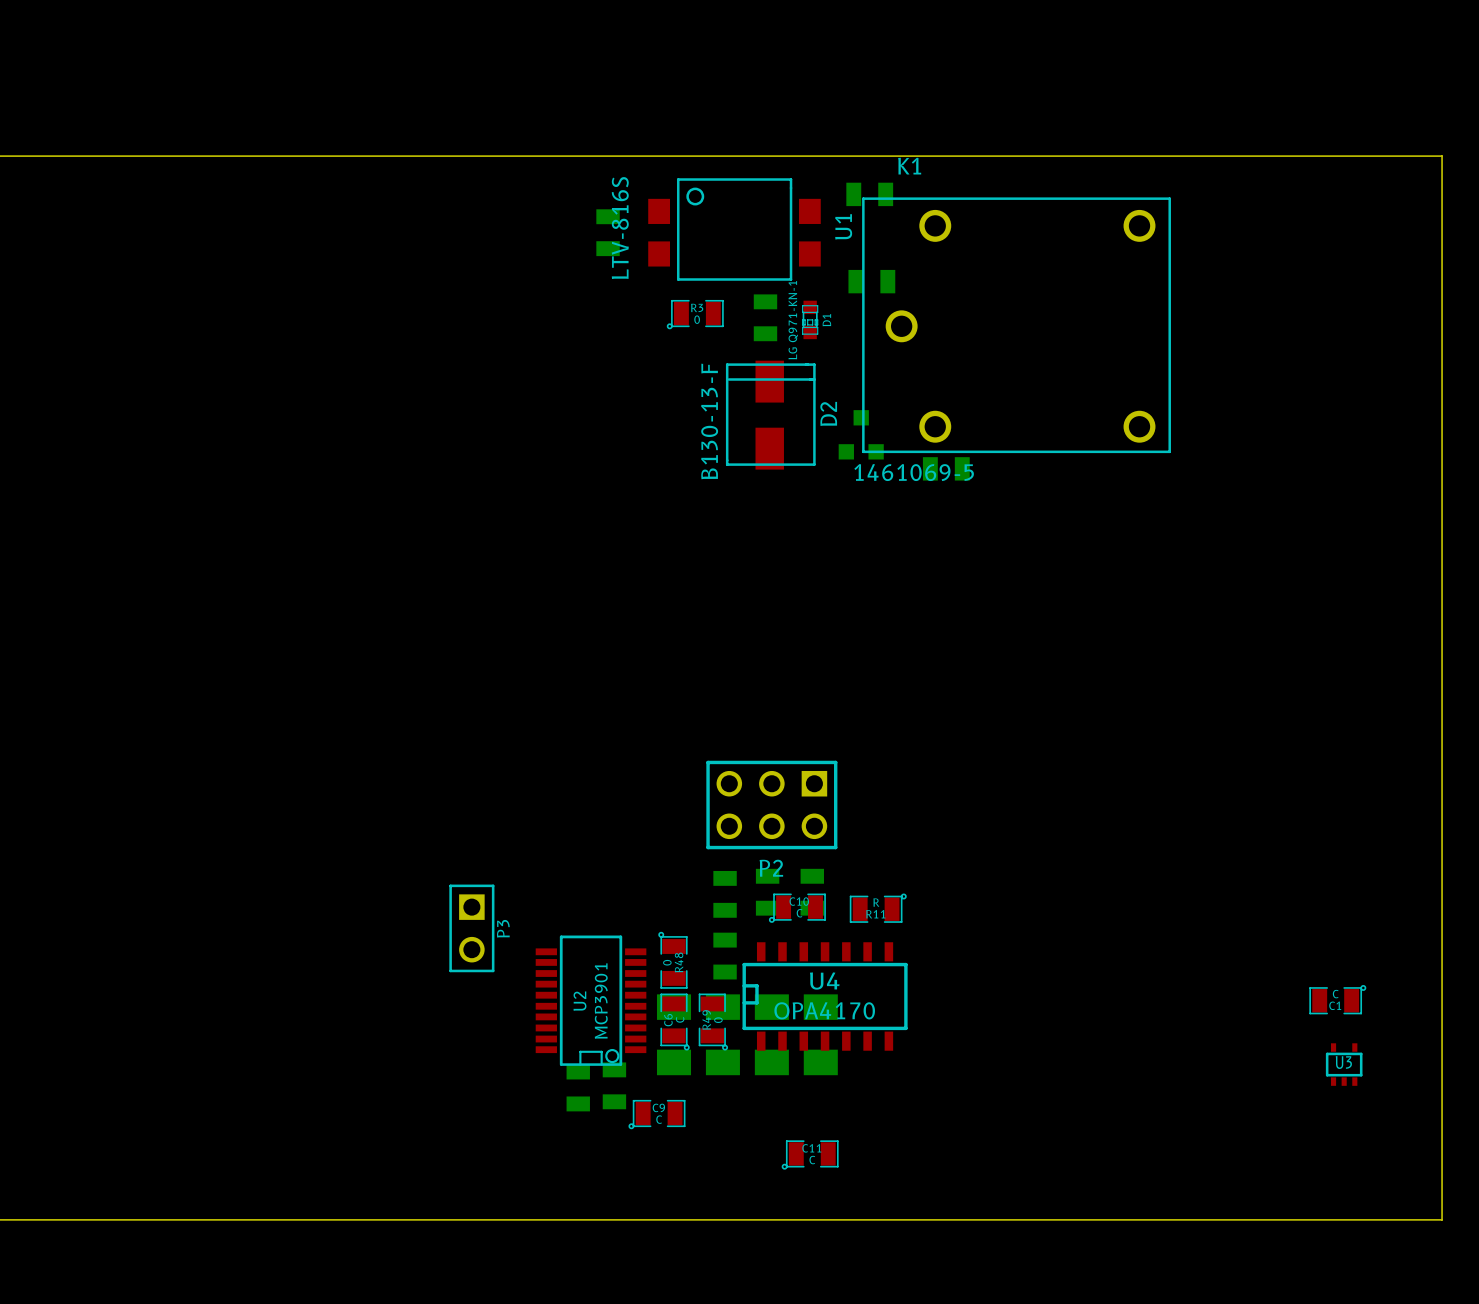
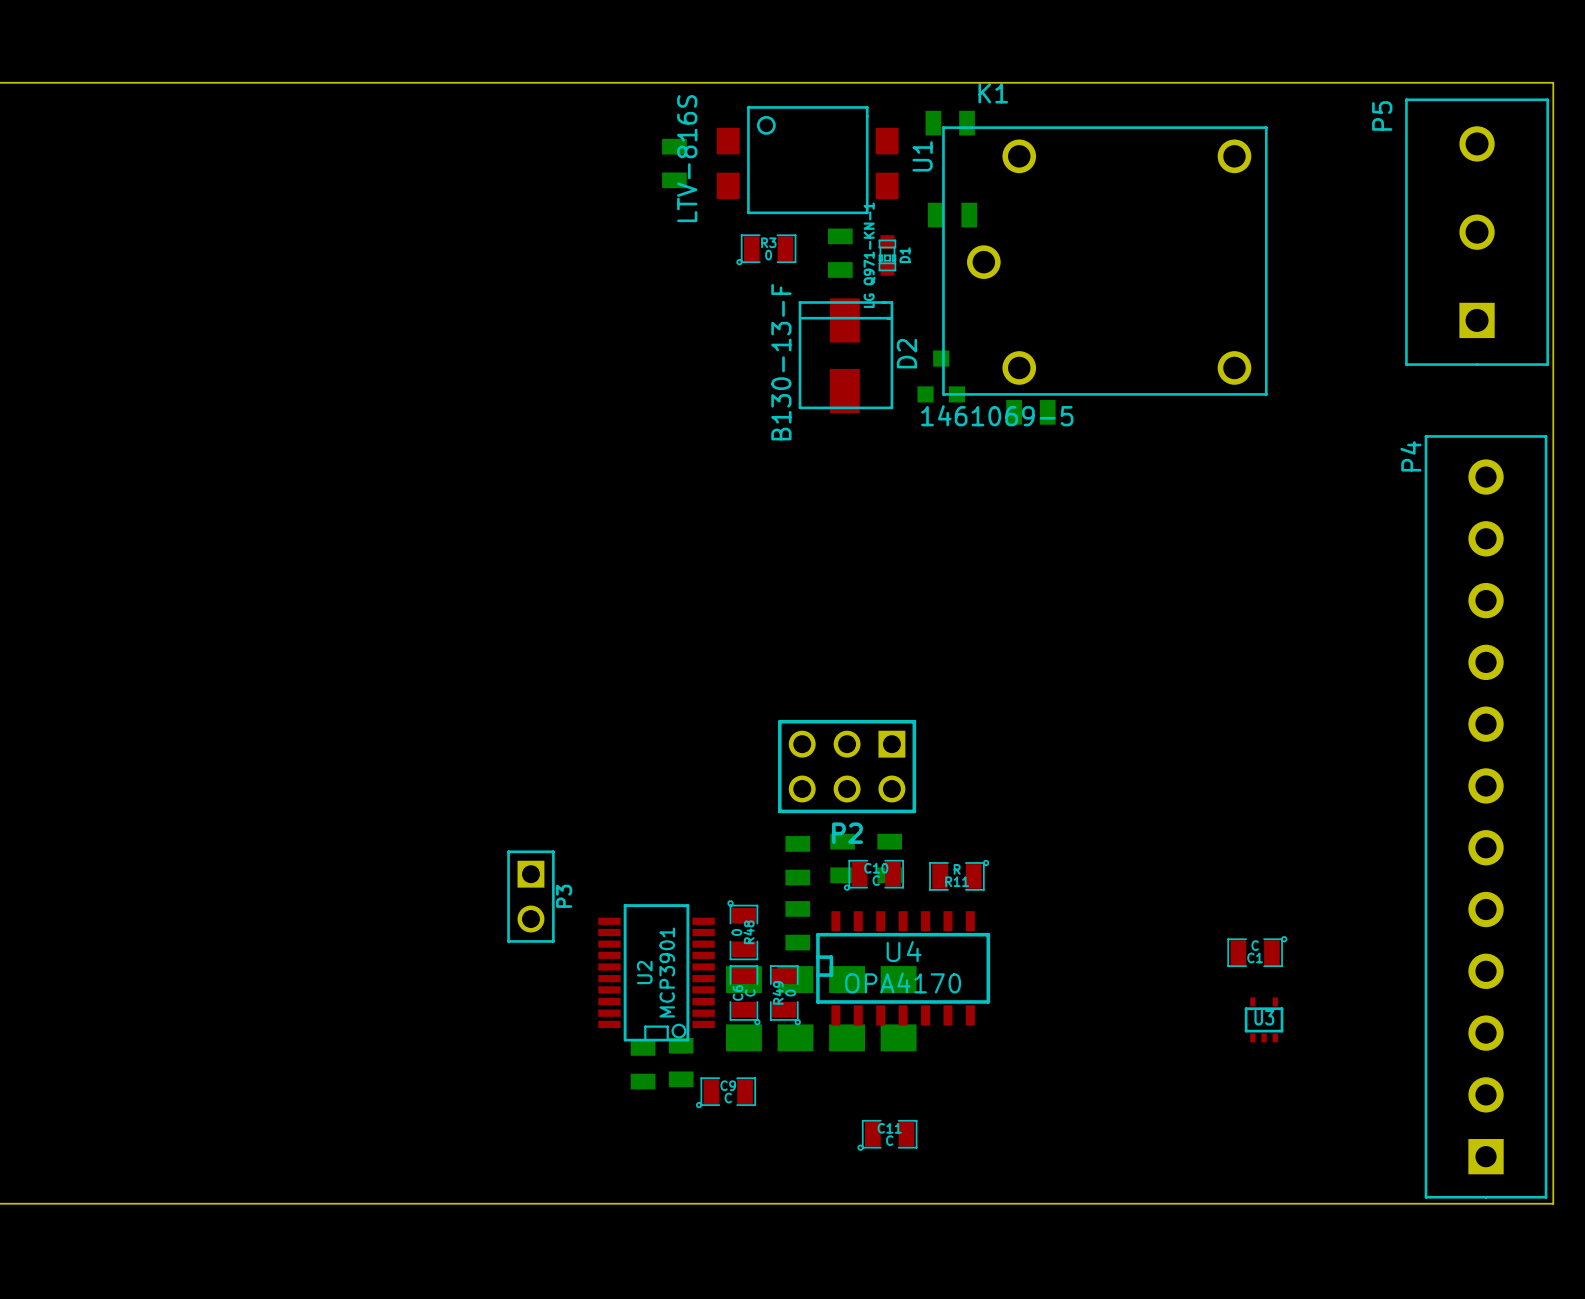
P5: none -> (1477, 232)
P4: none -> (1486, 816)
C1 position: (1337, 999) -> (1257, 951)
U3 position: (1344, 1064) -> (1264, 1019)

